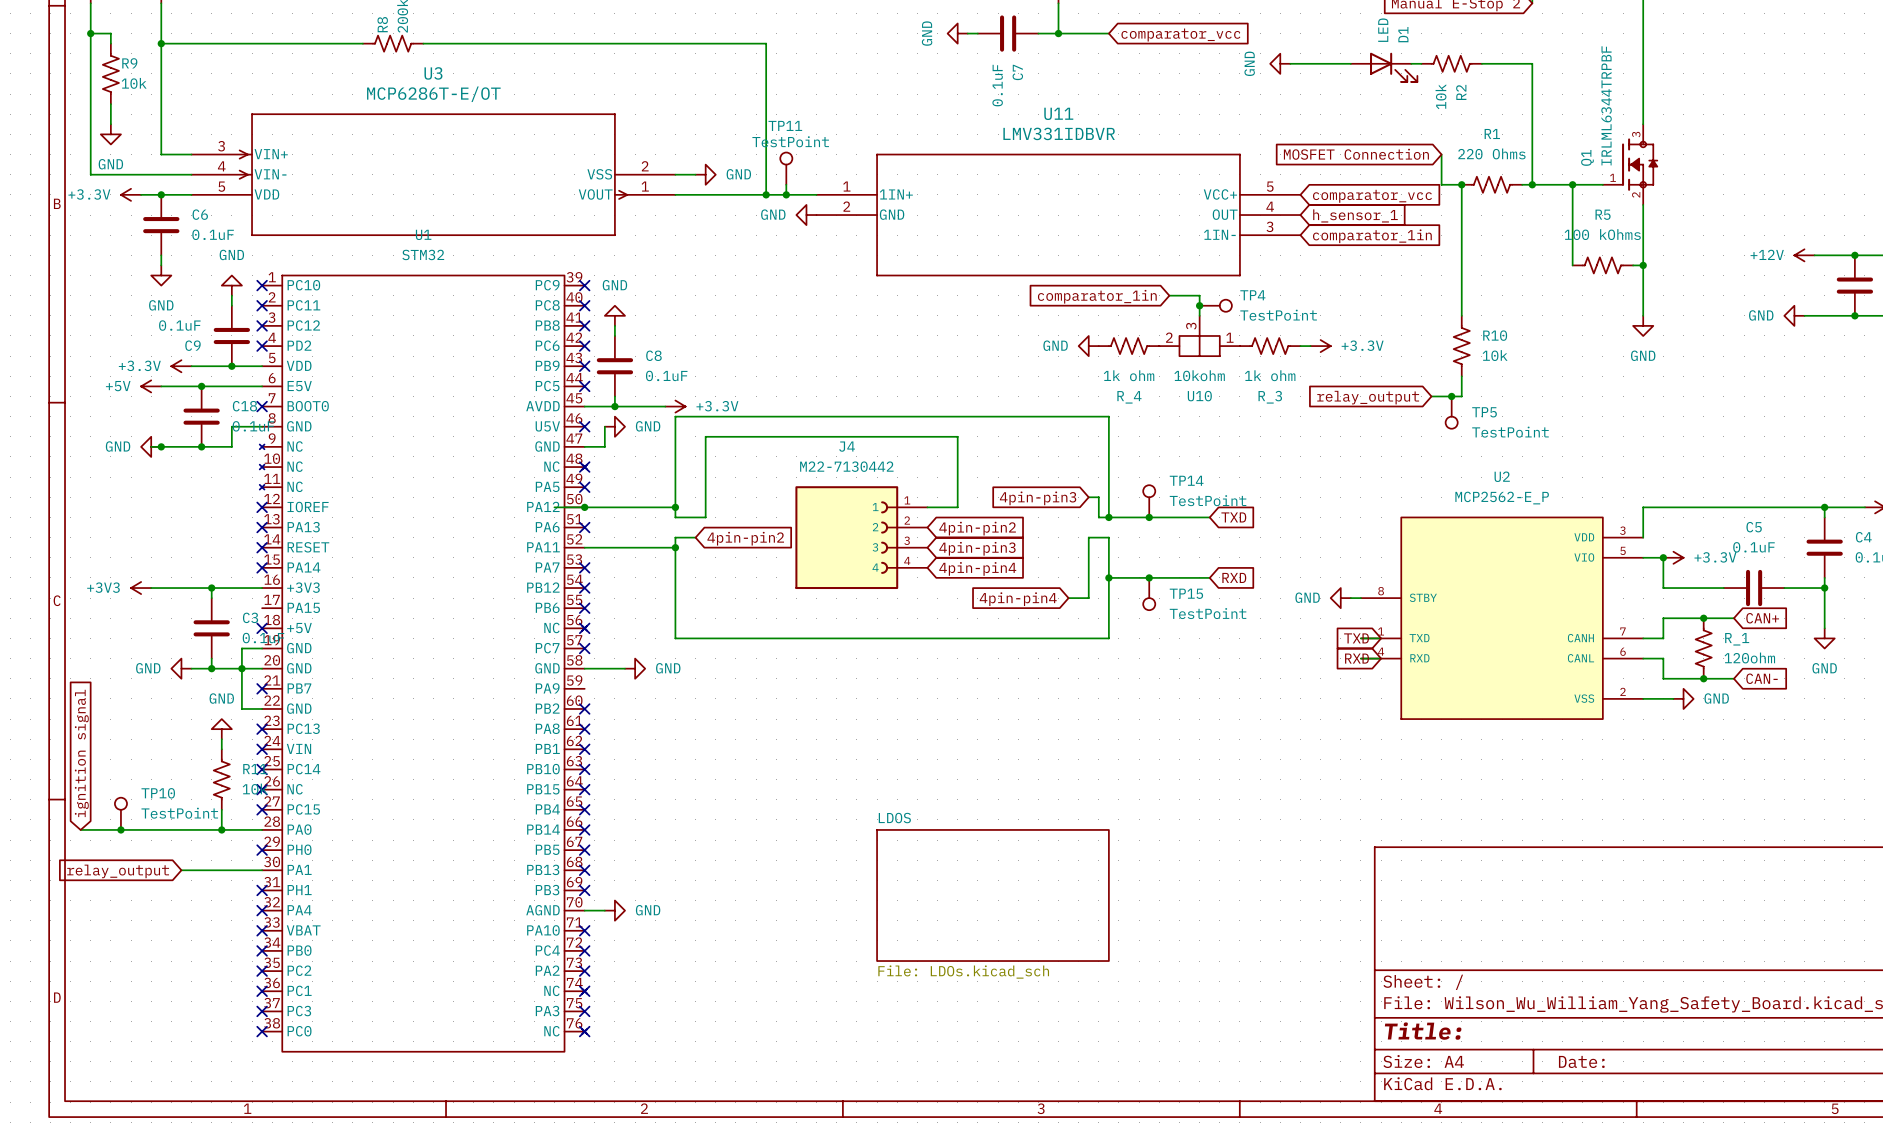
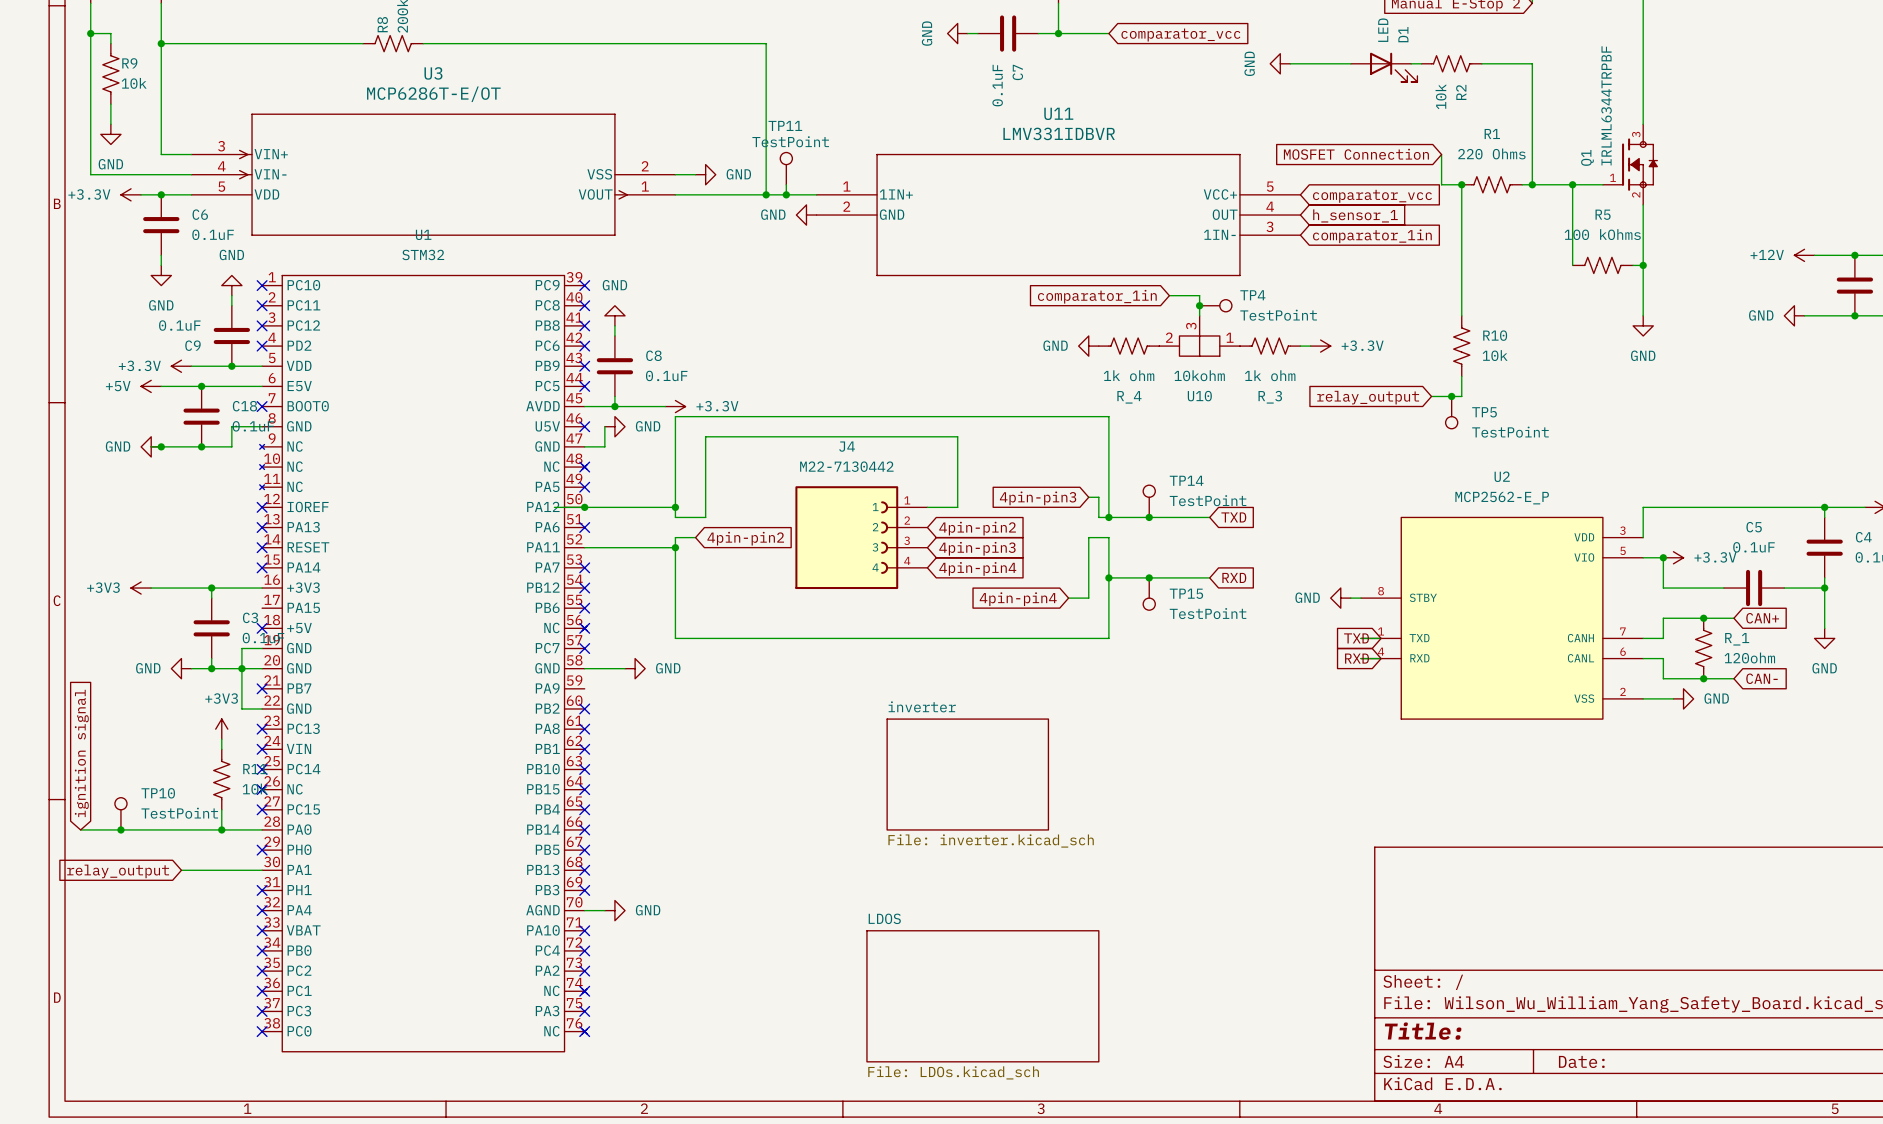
power symbol: GND (221, 729) -> +3V3 (221, 729)
sheet inverter: none -> File: inverter.kicad_sch (967, 774)
sheet LDOS position: (992, 895) -> (982, 996)

